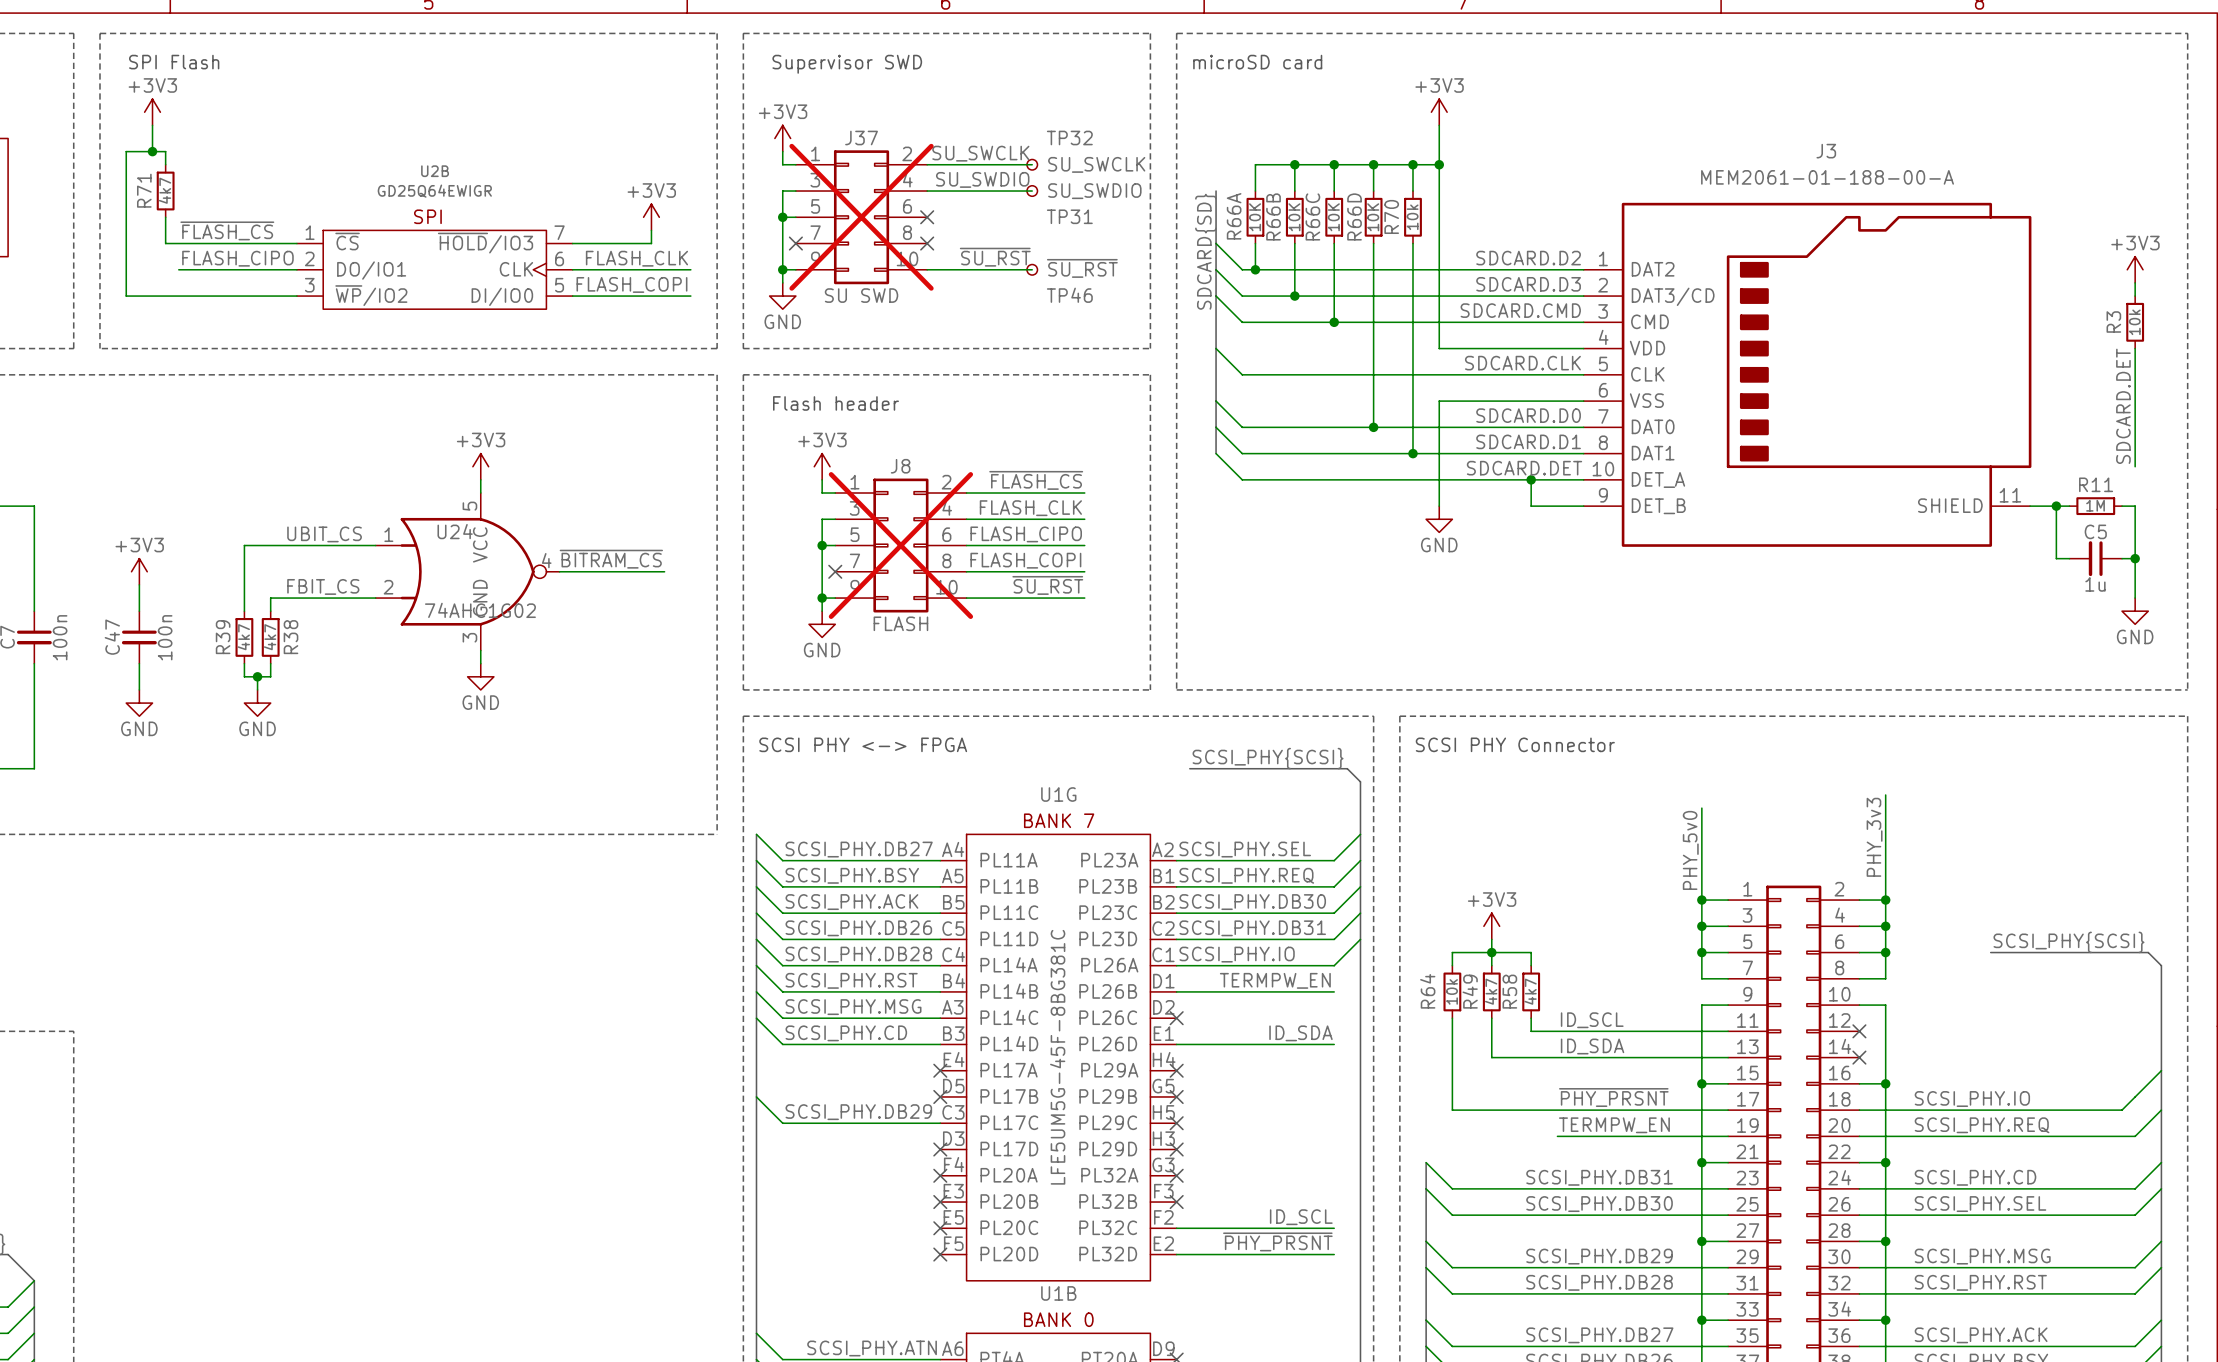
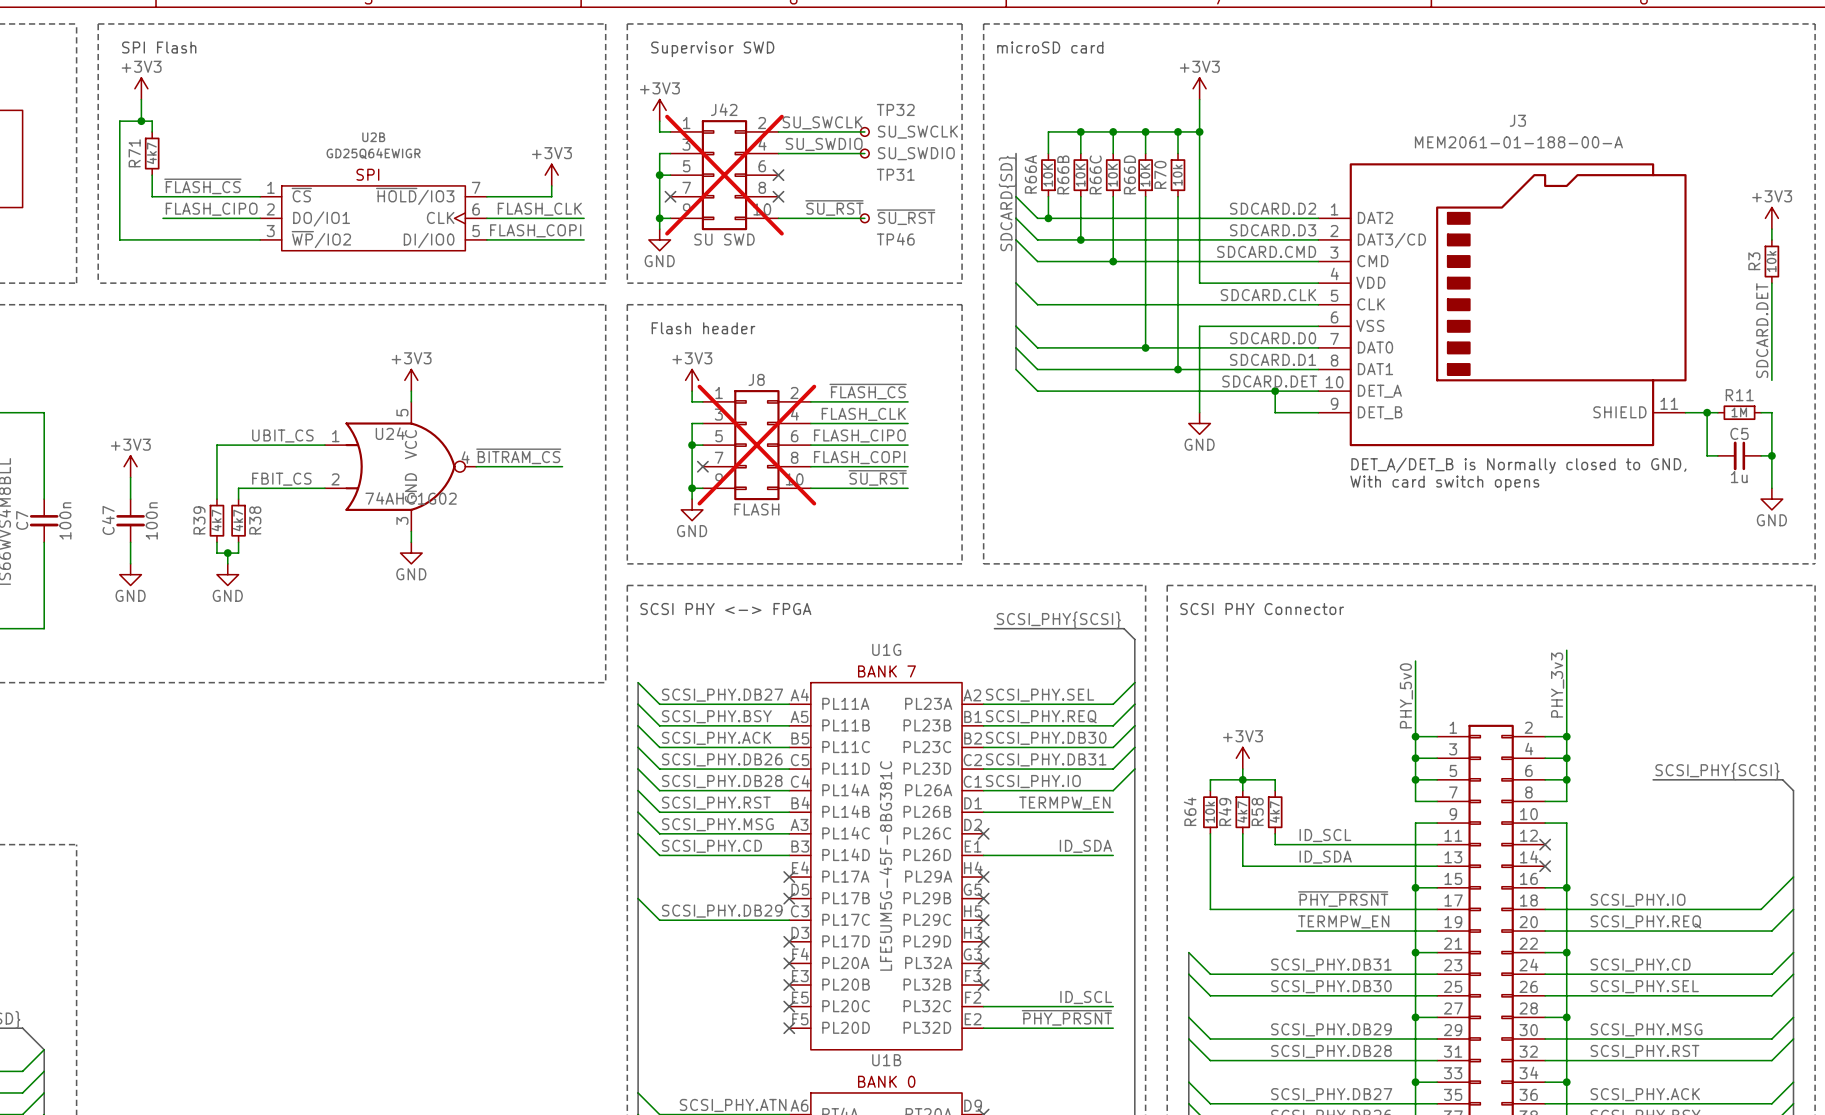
J37 name: J37 (861, 138) -> J42 (724, 109)
text: none -> DET_A/DET_B is Normally closed to GND, (1518, 465)
text: none -> With card switch opens (1444, 483)

